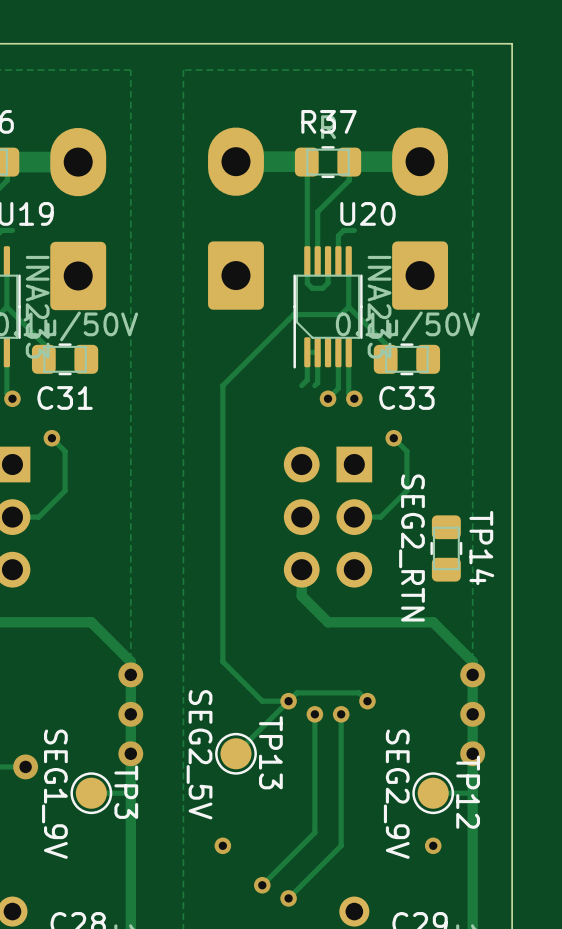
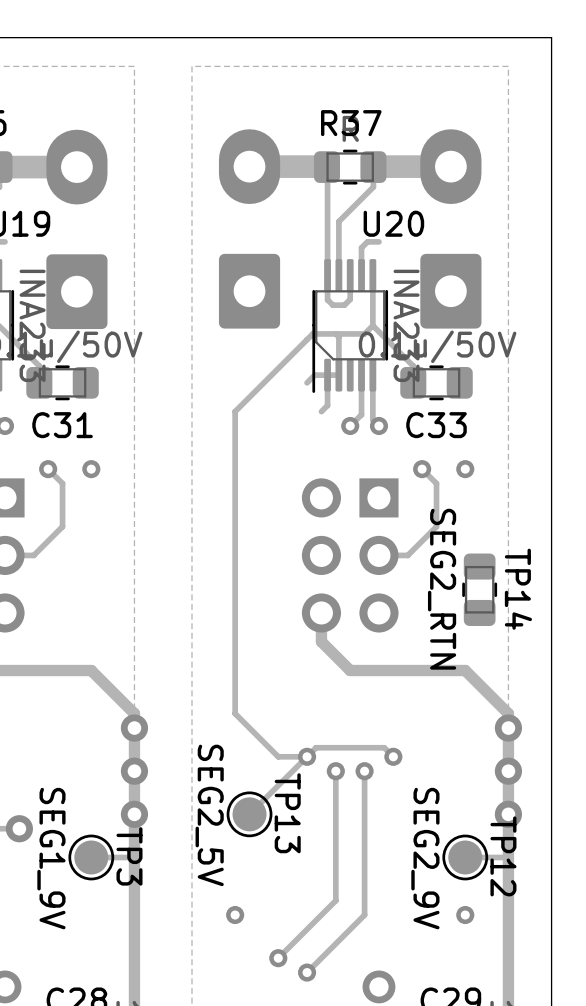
track: none -> (327, 375) (314, 375) (307, 382)
track: (317, 352) (317, 382) (314, 385) -> (338, 375) (338, 336) (335, 333)
via: none -> (91, 469)
via: none -> (465, 469)

